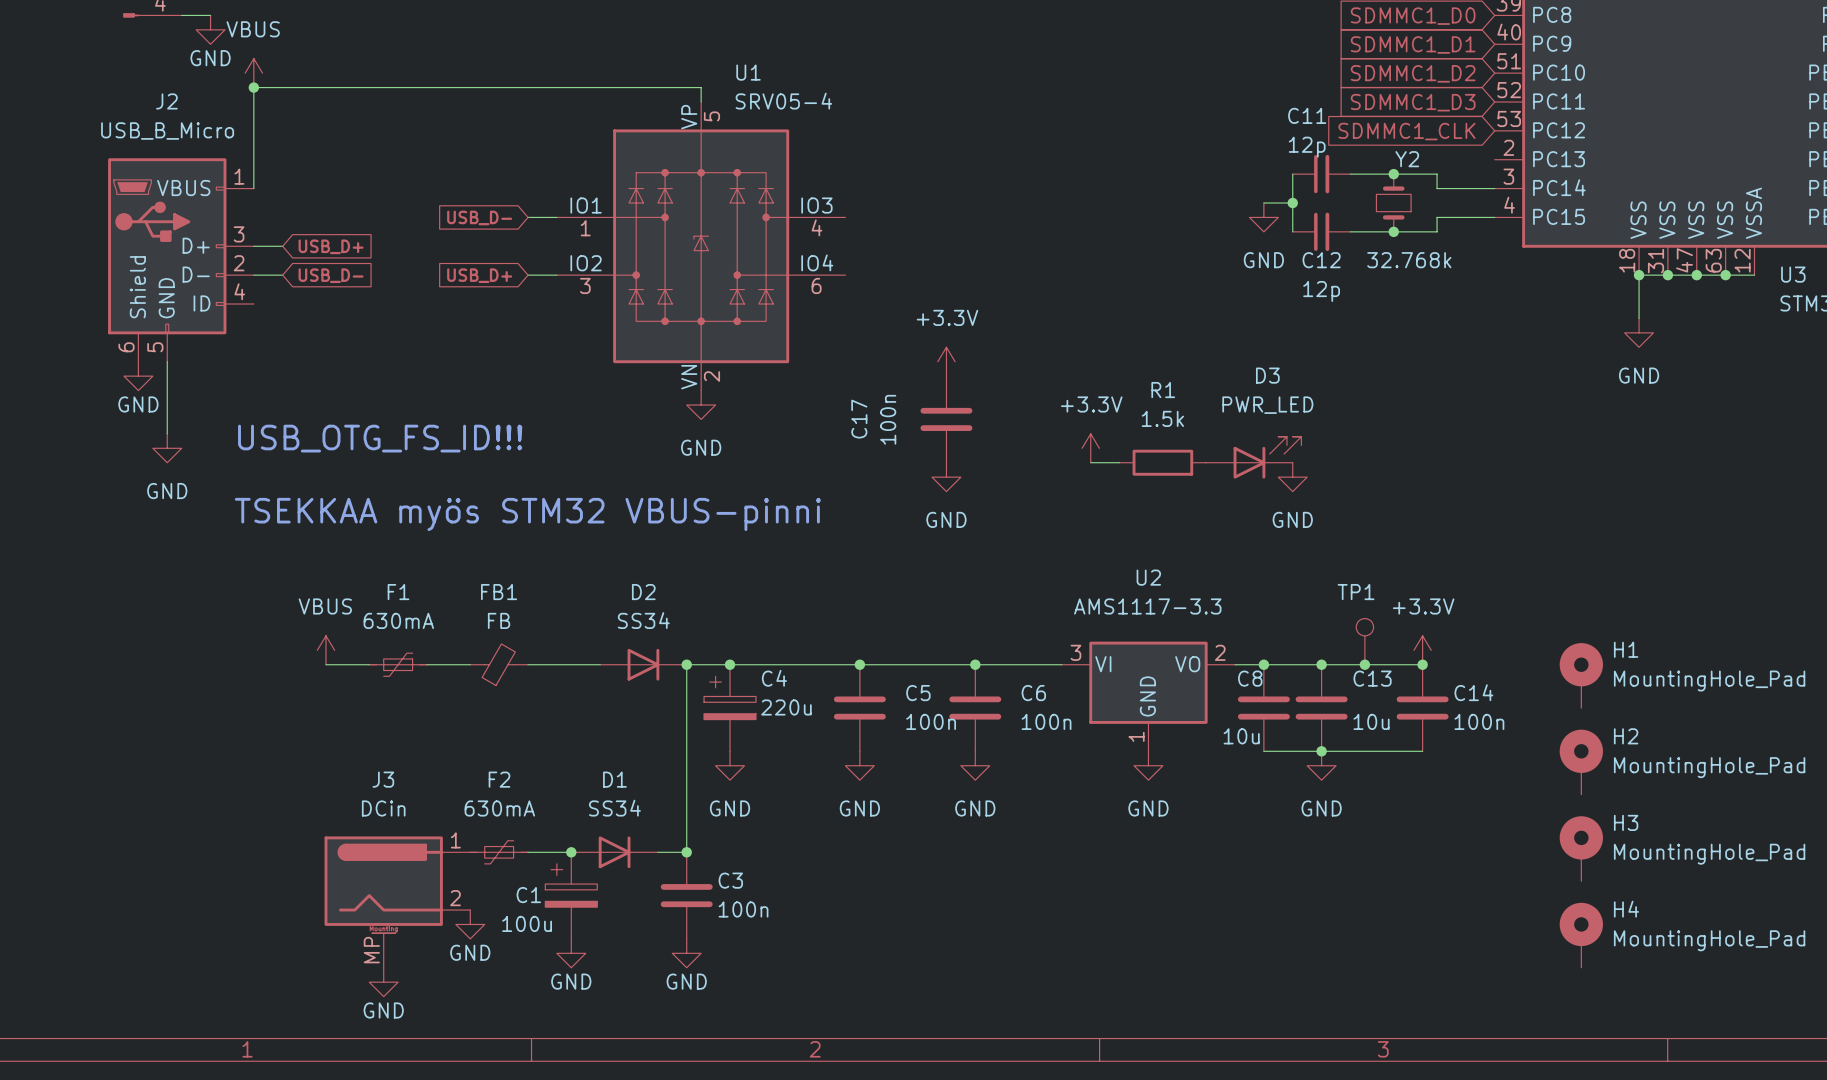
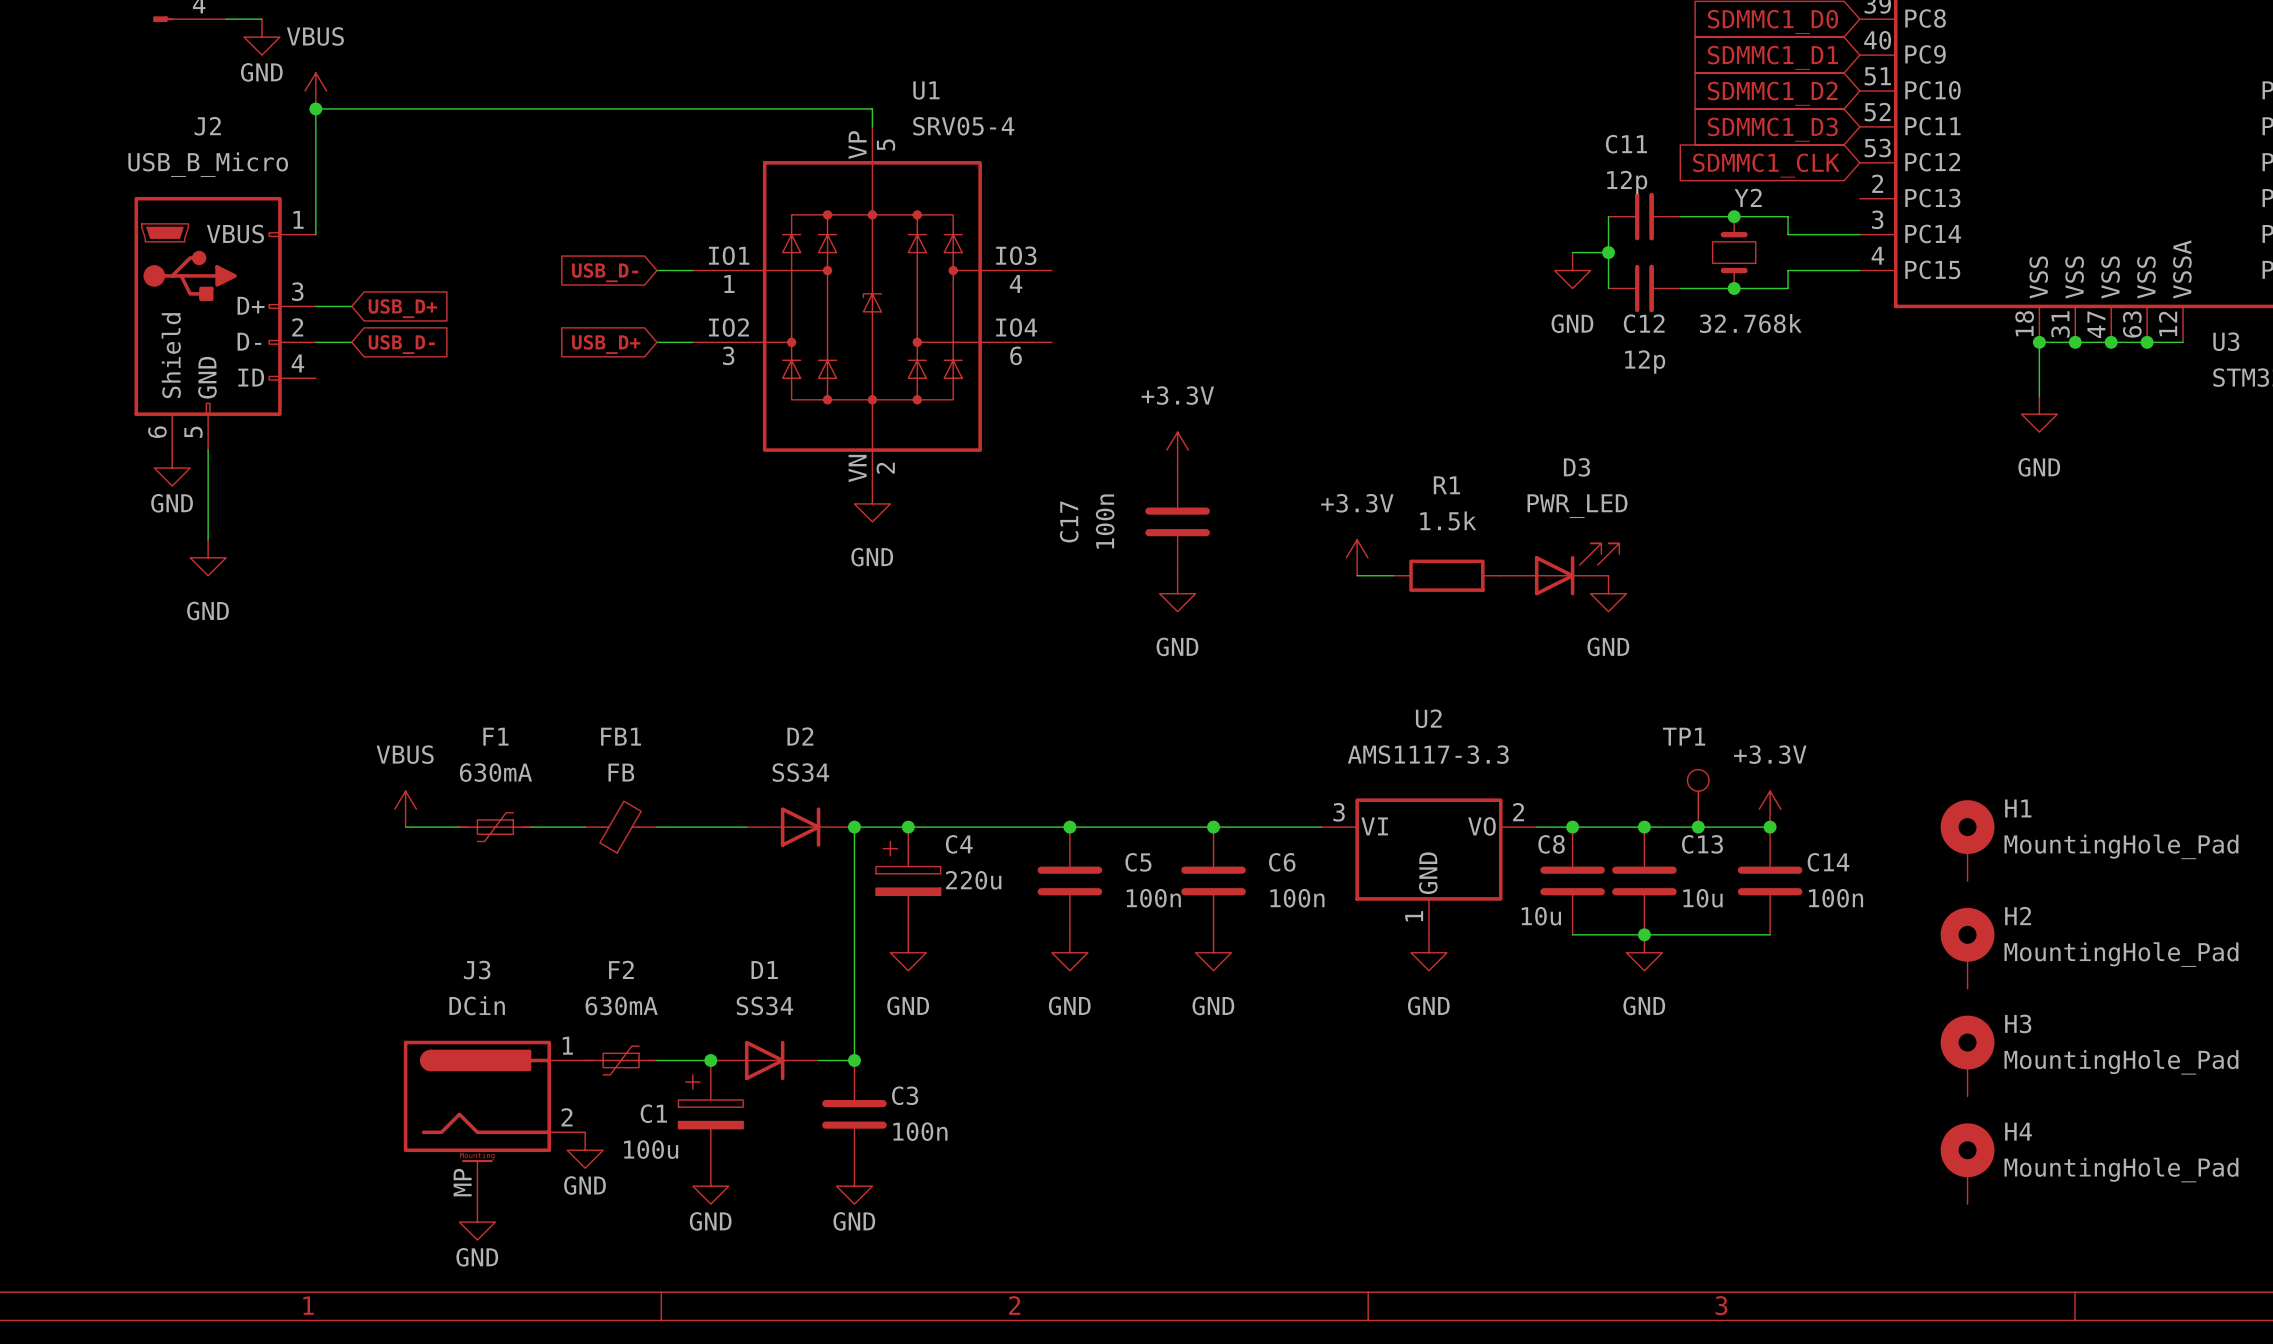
text: USB_OTG_FS_ID!!! (380, 438) -> none
text: TSEKKAA myös STM32 VBUS-pinni (527, 514) -> none

